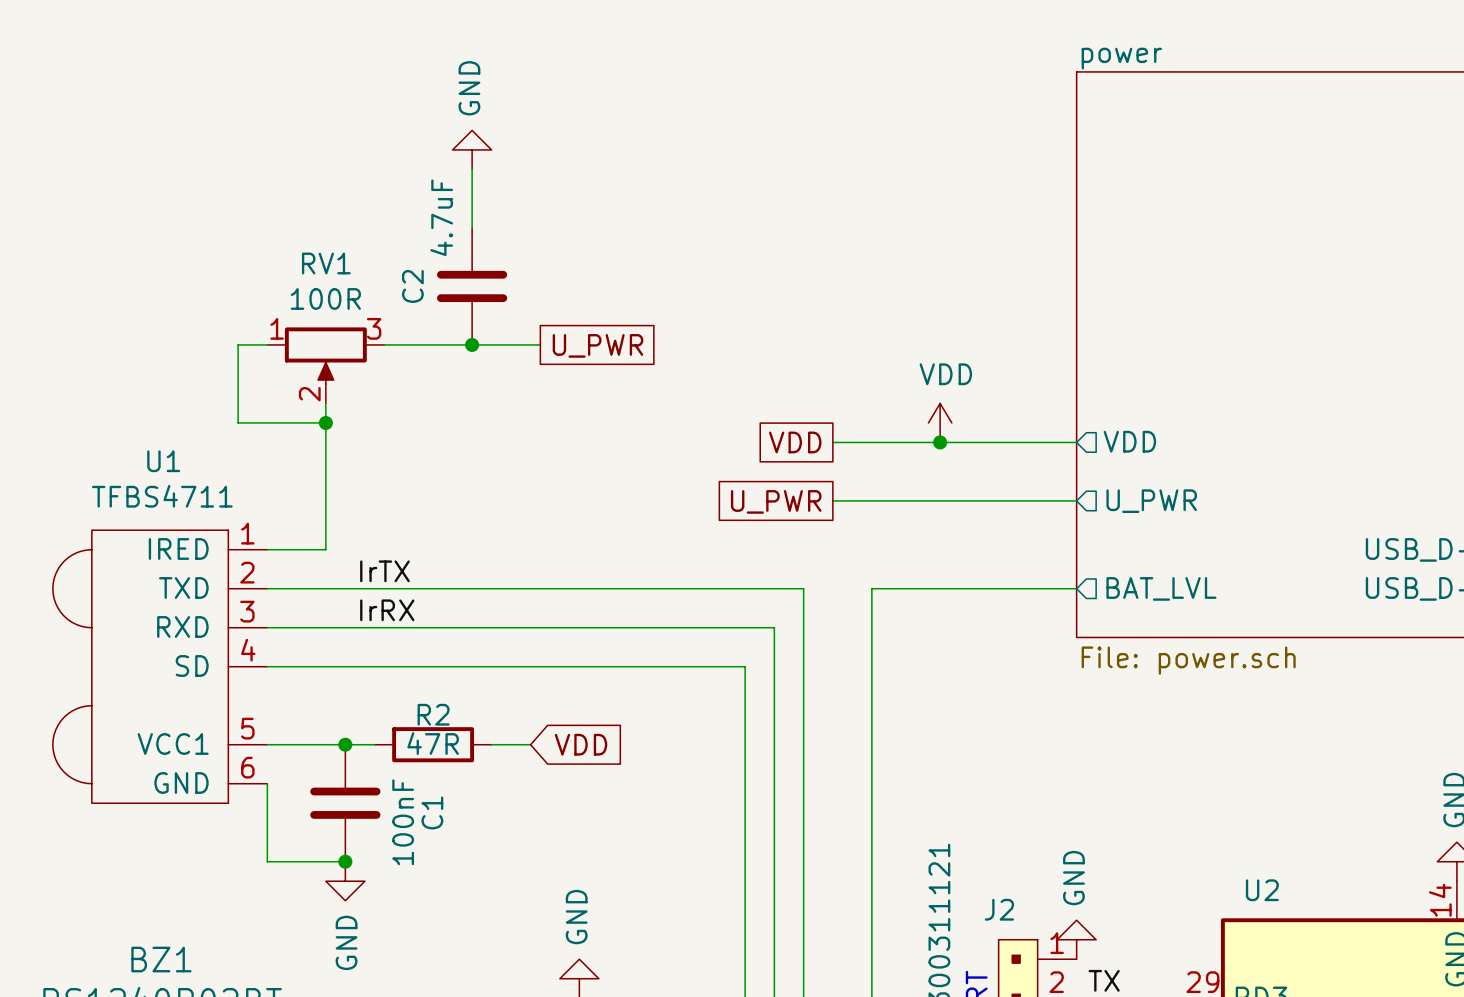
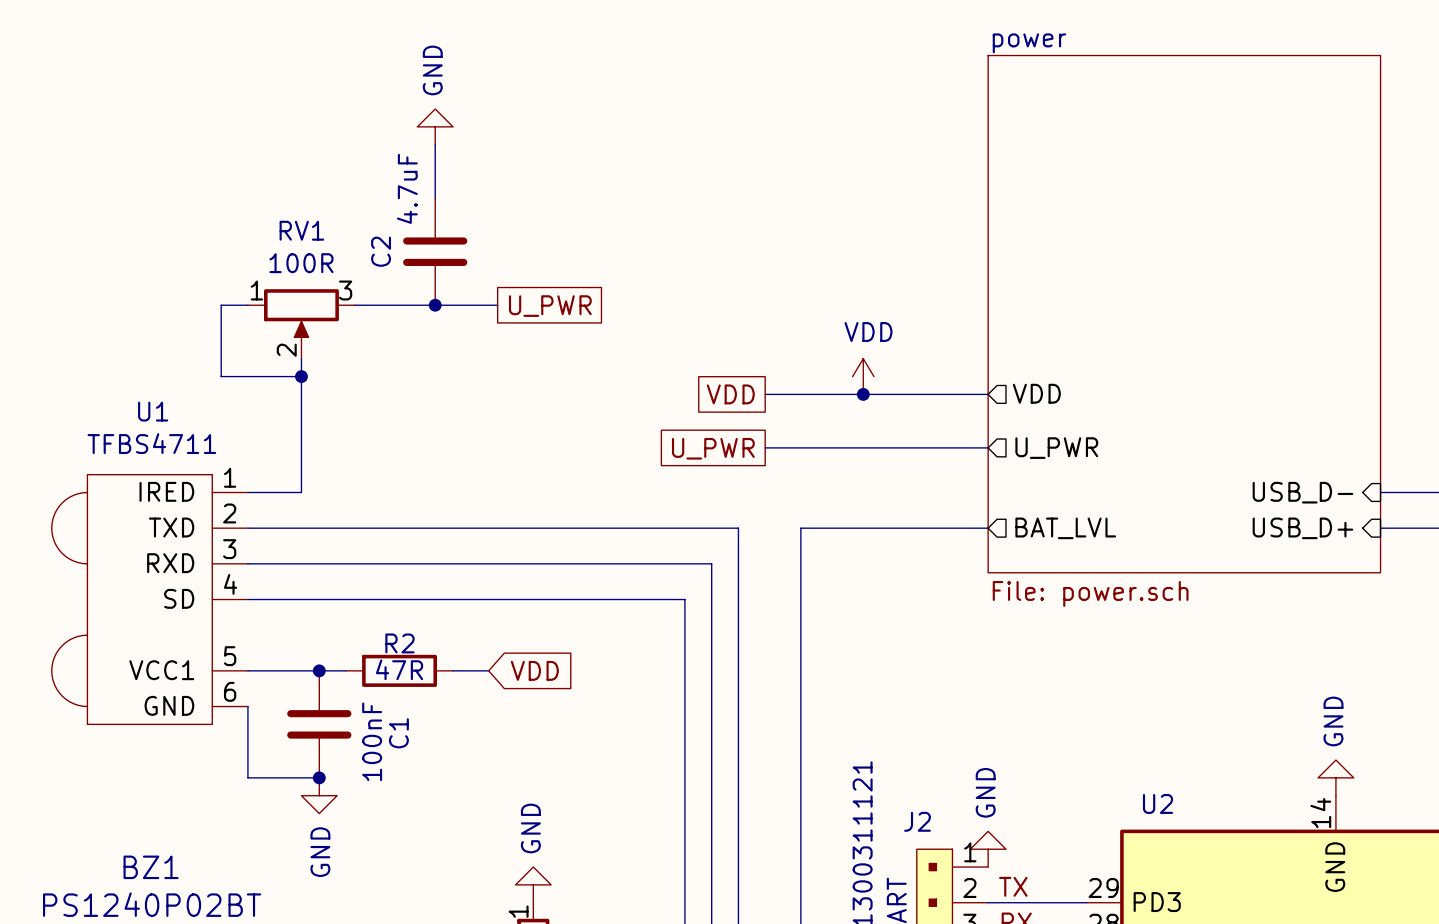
label: IrTX (384, 571) -> none
label: IrRX (387, 610) -> none

